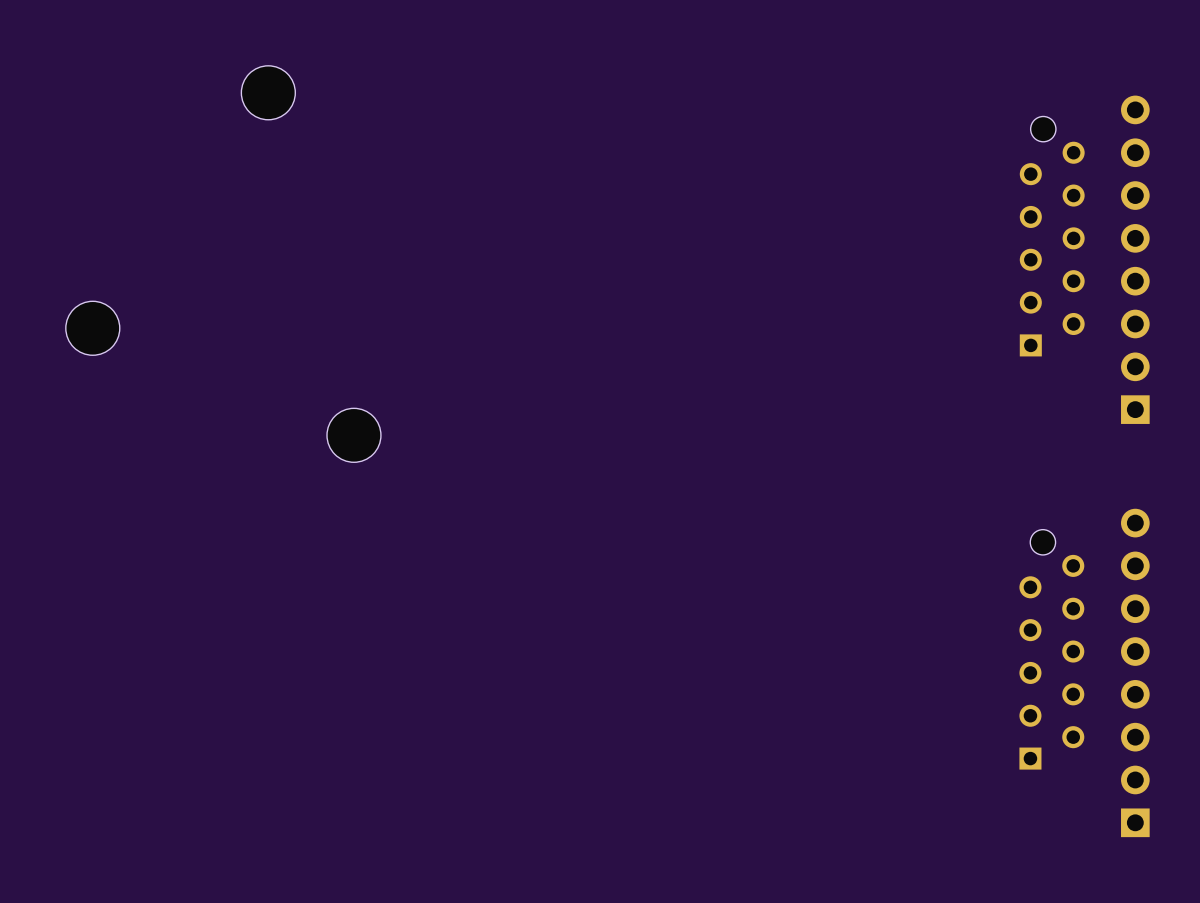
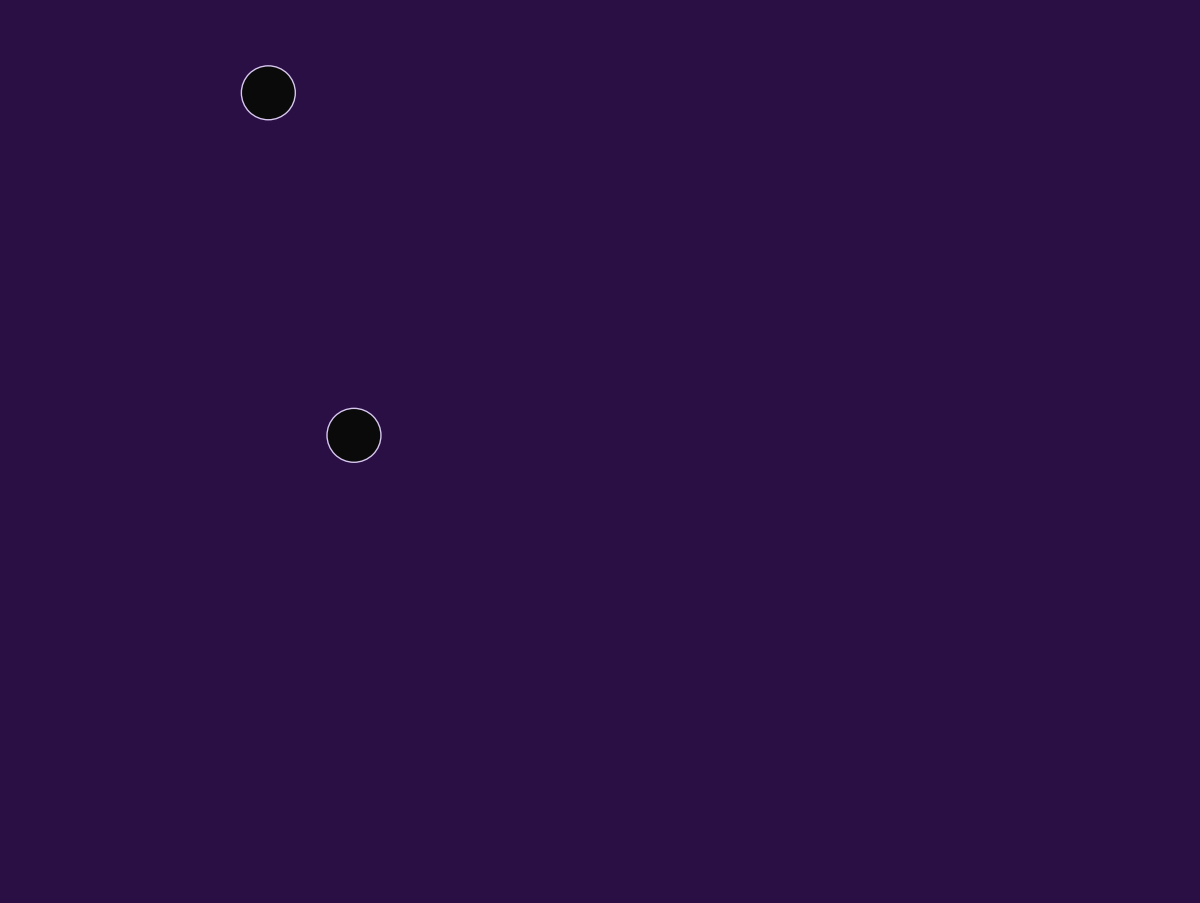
part: (1052, 236) -> none
part: (1135, 259) -> none
part: (92, 328) -> none
part: (1051, 649) -> none
part: (1135, 672) -> none

